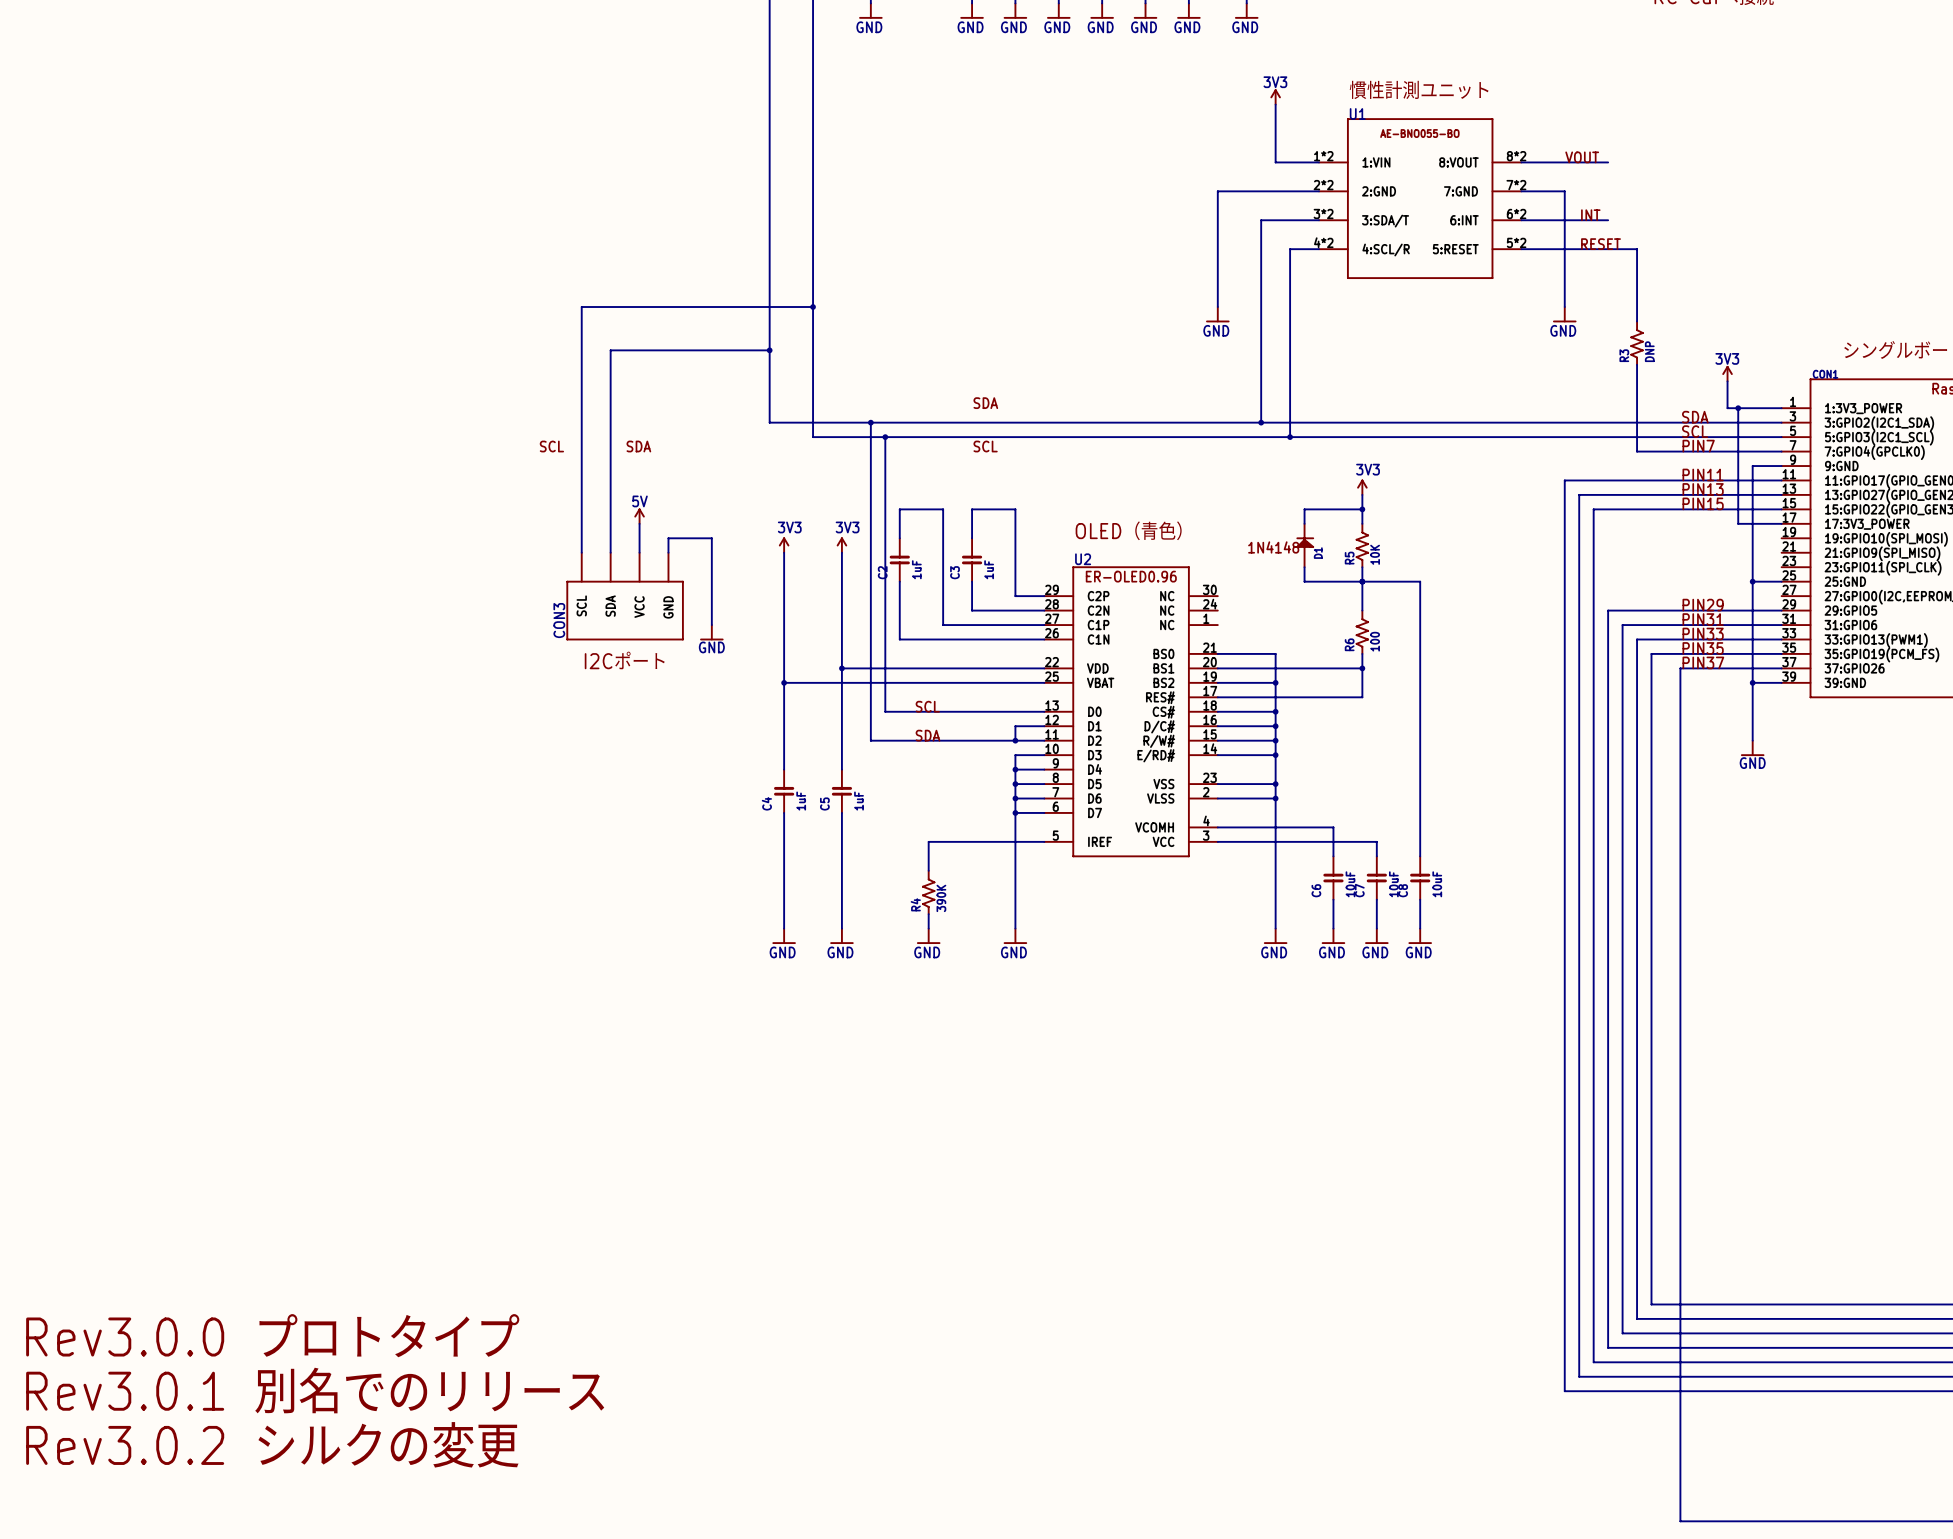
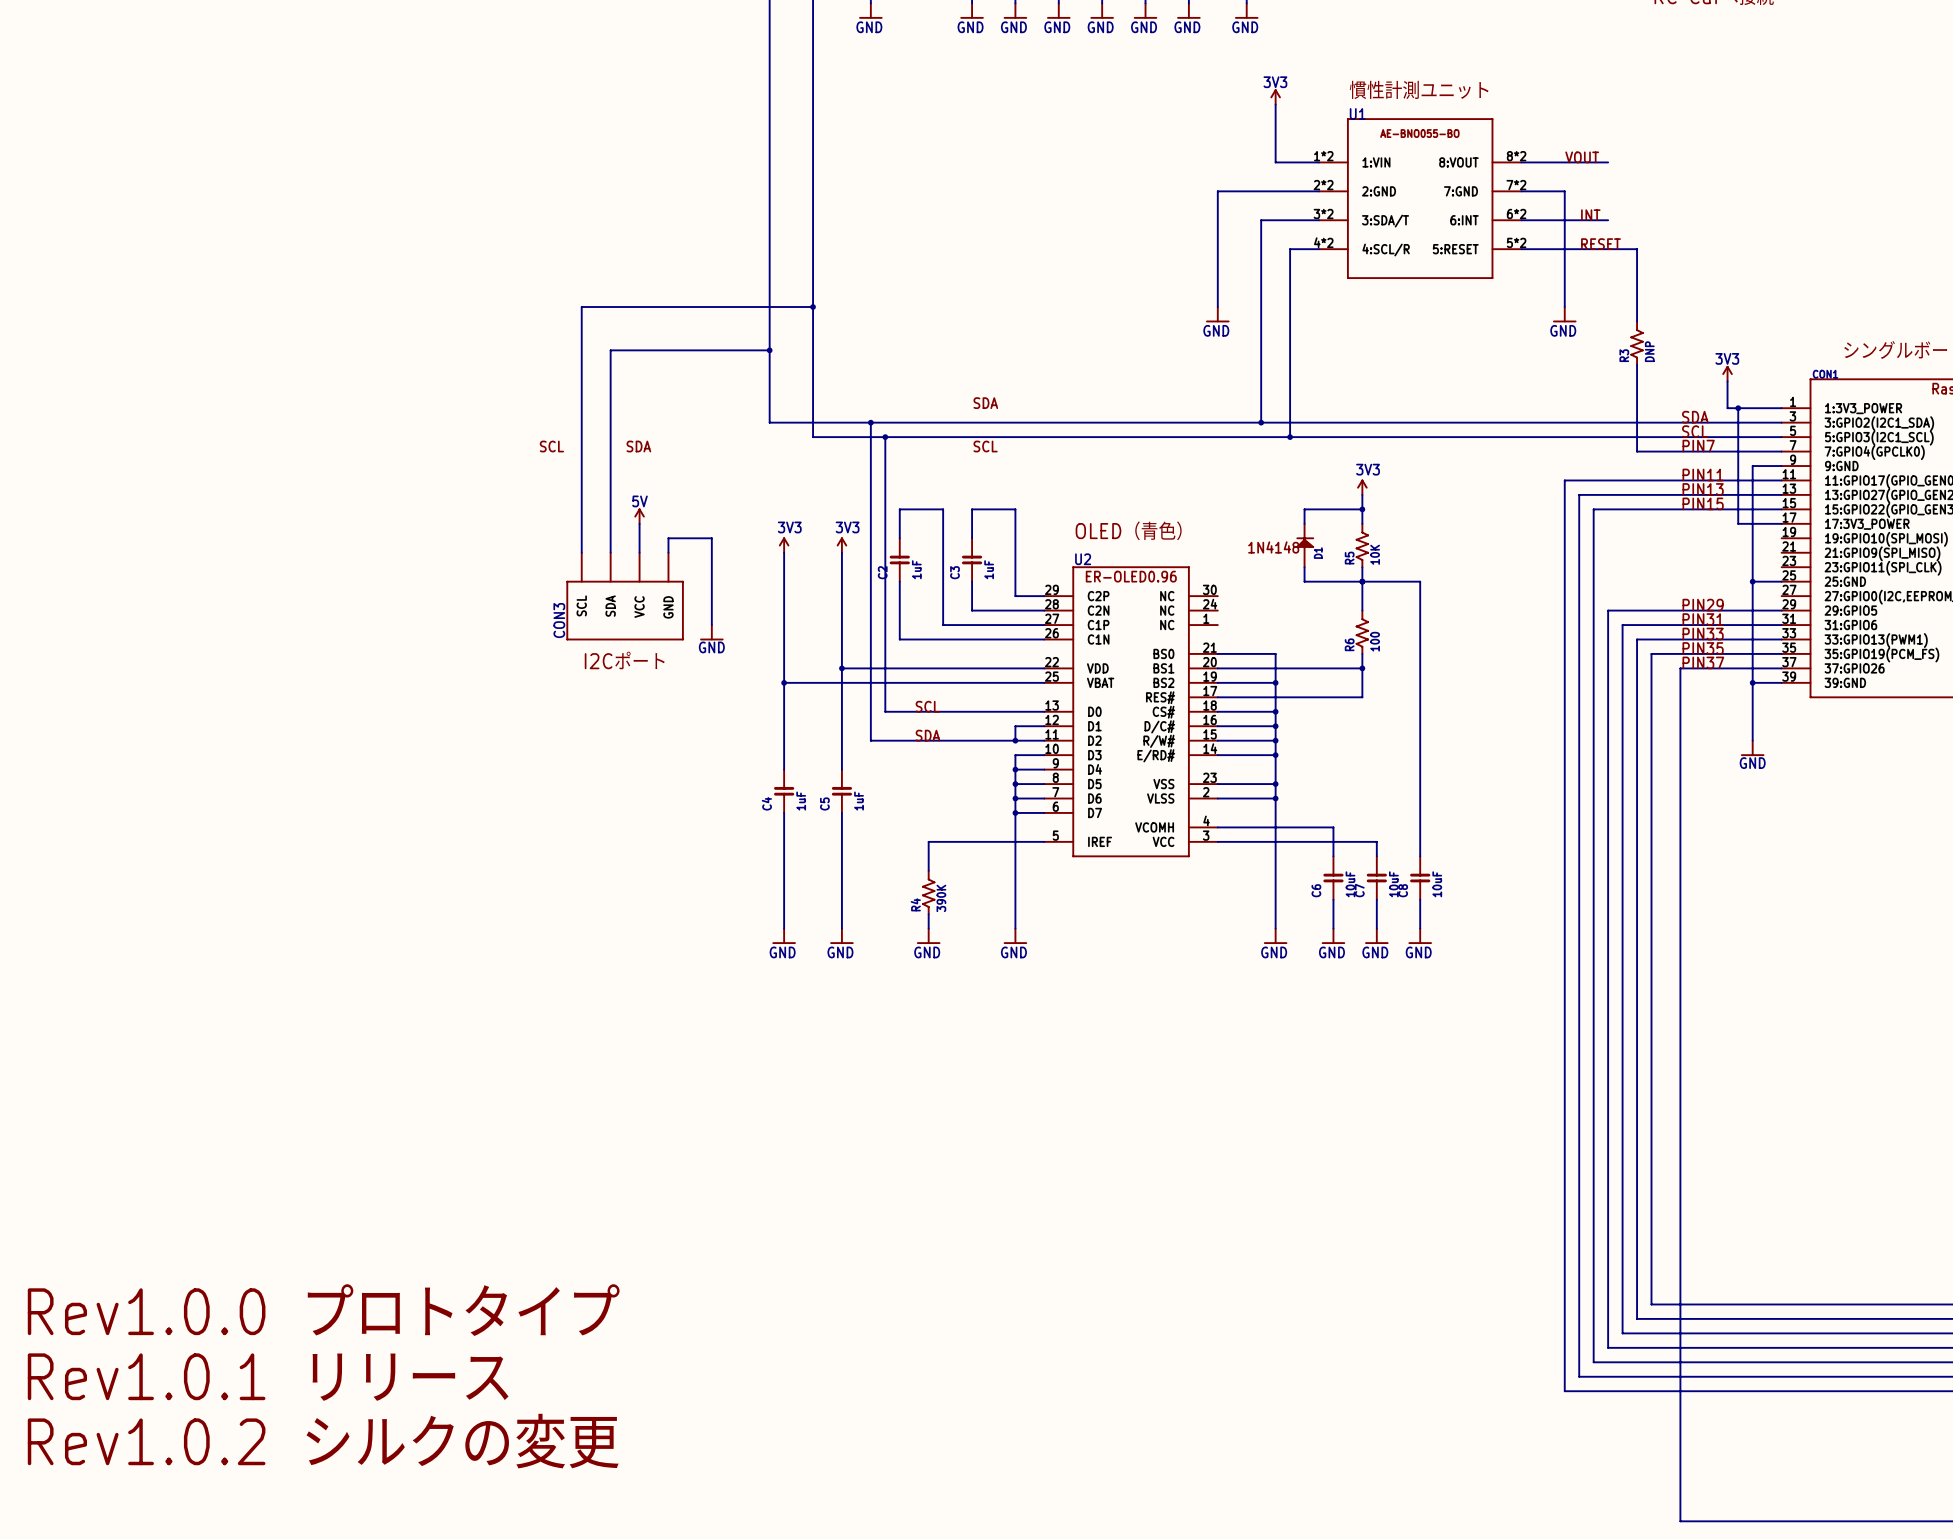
text: Rev3.0.0 プロトタイプ (273, 1335) -> Rev1.0.0 プロトタイプ (324, 1310)
text: Rev3.0.1 別名でのリリース (315, 1390) -> Rev1.0.1 リリース (269, 1377)
text: Rev3.0.2 シルクの変更 (273, 1444) -> Rev1.0.2 シルクの変更 (324, 1441)

